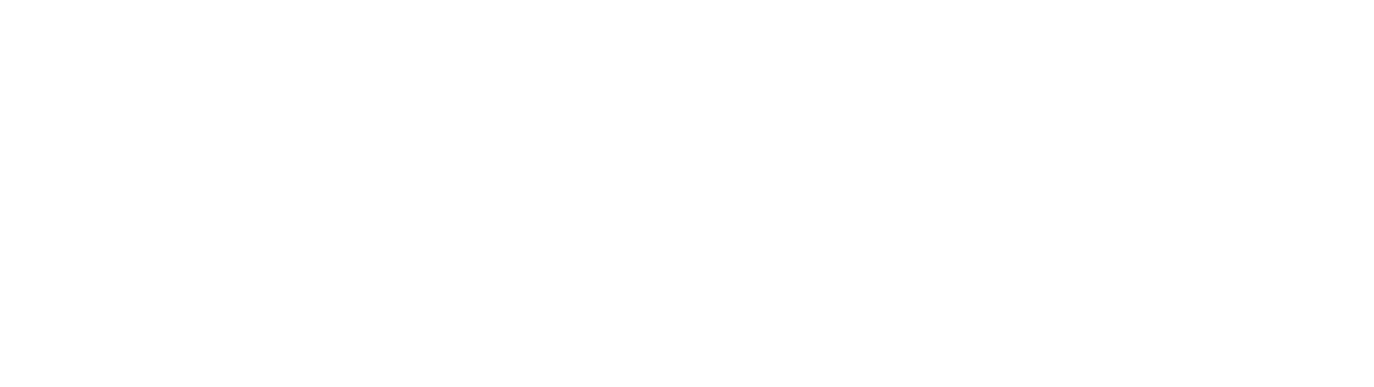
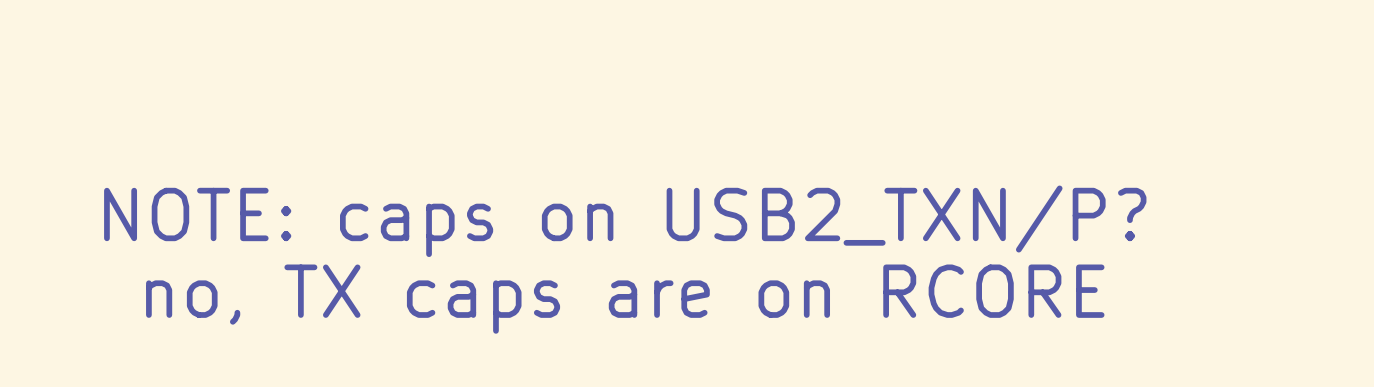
text: none -> NOTE: caps on USB2_TXN/P? (625, 221)
text: none -> no, TX caps are on RCORE (625, 299)

